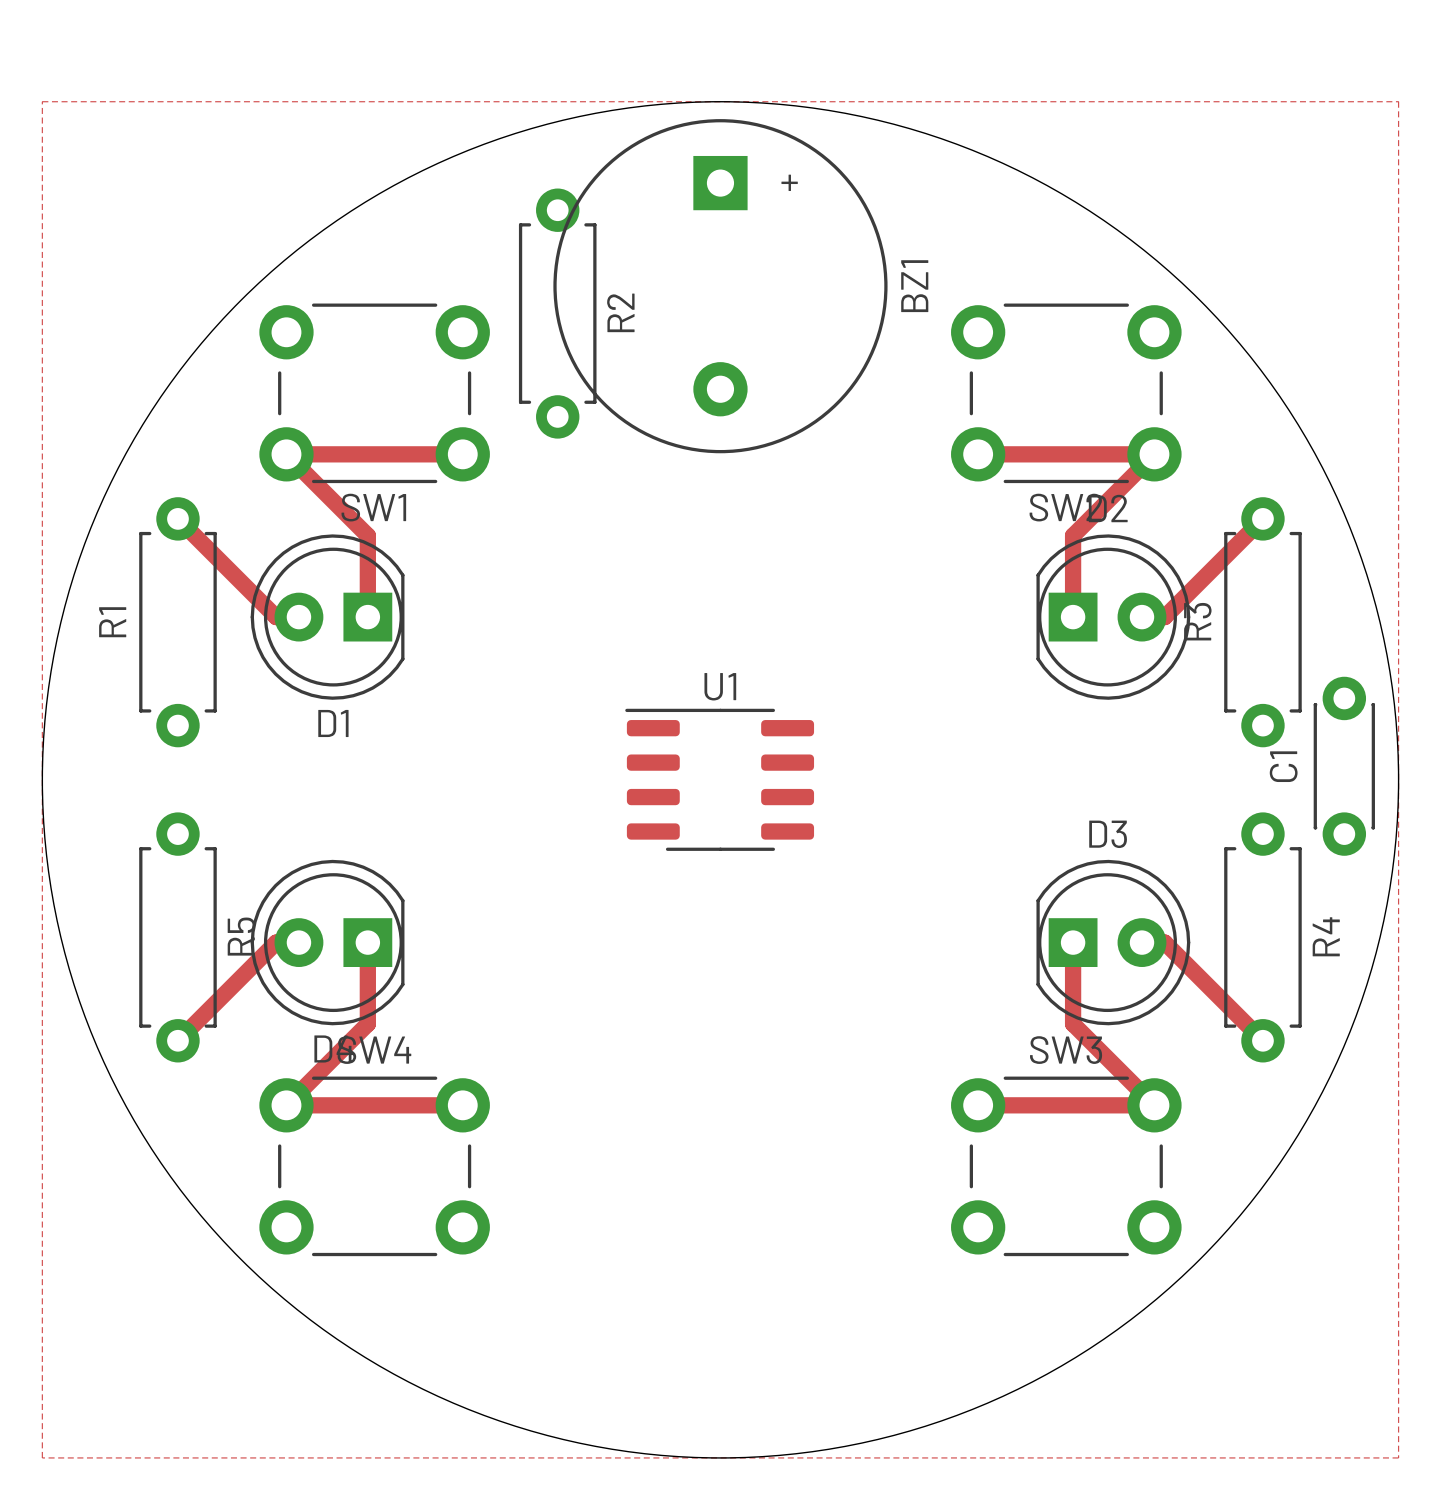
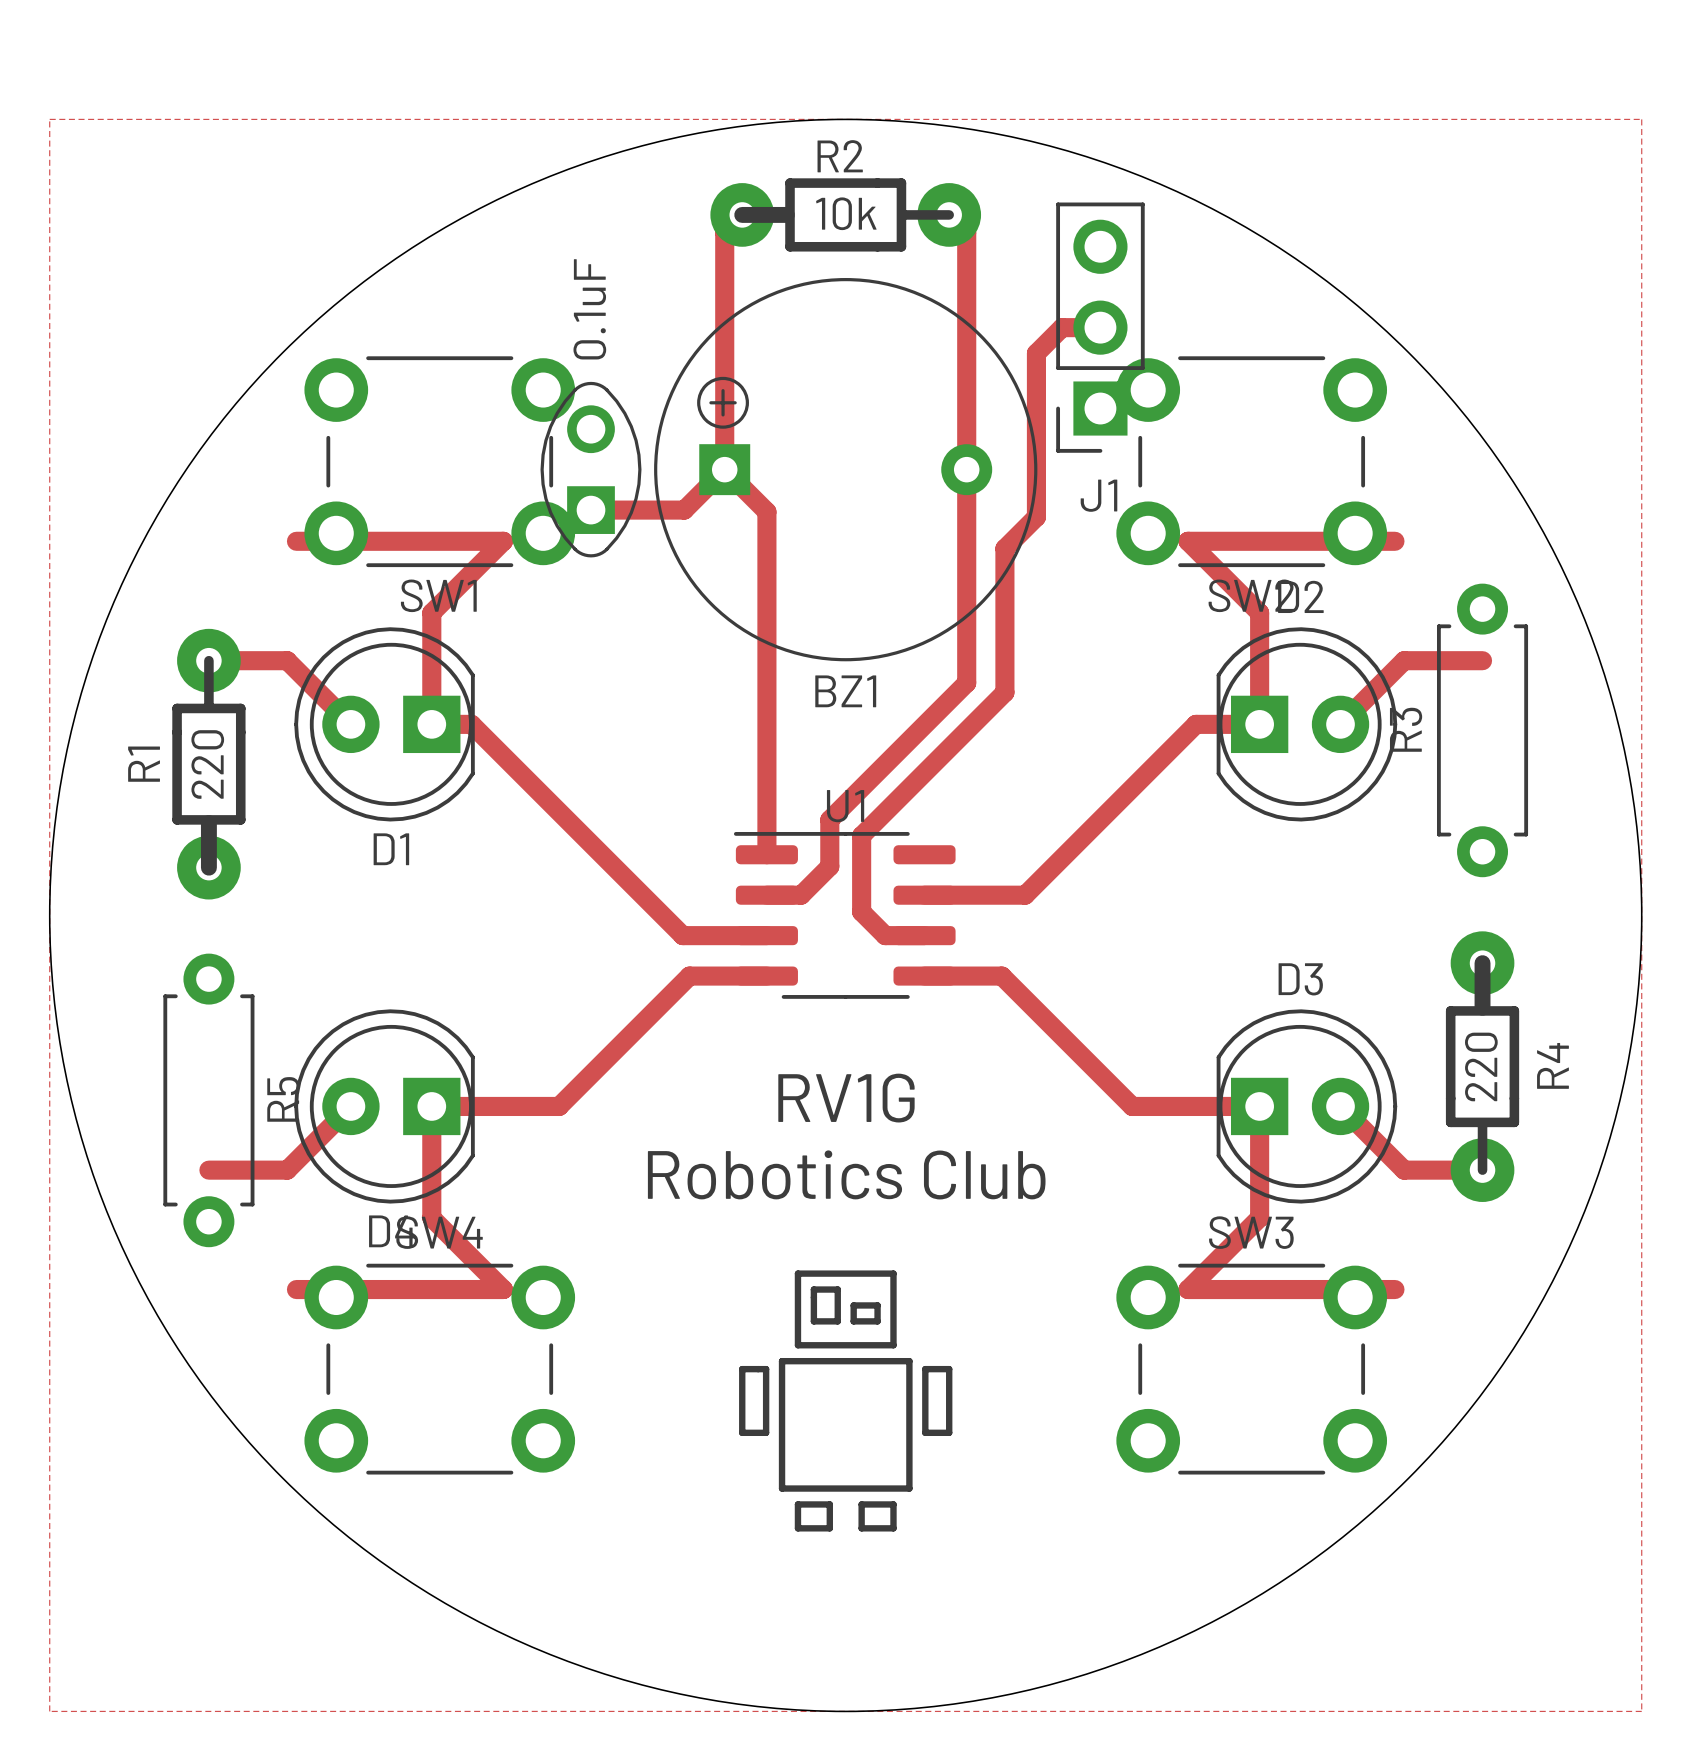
BZ1 footprint: [553, 119, 888, 454] -> [654, 278, 1038, 662]
R2 value: none -> 10k (846, 213)
track: none -> (742, 214) (724, 232) (724, 469)
track: none -> (949, 214) (966, 232) (966, 682) (829, 819) (829, 866) (801, 895) (766, 895)
R2 footprint: [518, 188, 597, 439] -> [710, 178, 982, 252]
track: none -> (1100, 327) (1062, 327) (1036, 353) (1036, 517) (1004, 548) (1004, 692) (861, 835) (861, 911) (885, 935) (924, 935)
J1: none -> (1100, 327)
BZ1 name position: BZ1 (914, 286) -> BZ1 (845, 691)
R2 name position: R2 (620, 312) -> R2 (840, 156)
part: none -> 0.1uF (591, 469)
track: none -> (724, 469) (766, 511) (766, 854)
track: none -> (724, 469) (684, 510) (591, 510)
track: (462, 454) (286, 454) (367, 535) -> (296, 541) (503, 541) (431, 612) (431, 628)
track: (978, 454) (1154, 454) (1073, 535) -> (1394, 541) (1188, 541) (1259, 612) (1259, 628)
R1 footprint: [139, 497, 217, 748] -> [172, 628, 246, 900]
track: (177, 518) (276, 617) (298, 617) -> (208, 660) (287, 660) (350, 724)
track: (1262, 518) (1164, 617) (1141, 617) -> (1482, 660) (1404, 660) (1340, 724)
track: none -> (431, 724) (471, 724) (682, 935) (766, 935)
track: none -> (1259, 724) (1195, 724) (1025, 895) (924, 895)
R1 value: none -> 220 (207, 764)
C1: (1344, 766) -> none
R4 footprint: [1224, 812, 1302, 1063] -> [1445, 931, 1520, 1202]
track: none -> (766, 976) (689, 976) (559, 1106) (431, 1106)
track: none -> (924, 976) (1001, 976) (1132, 1106) (1259, 1106)
R4 value: none -> 220 (1481, 1066)
text: none -> RV1G (846, 1098)
track: (298, 942) (276, 942) (177, 1040) -> (350, 1106) (287, 1170) (208, 1170)
track: (1141, 942) (1164, 942) (1262, 1040) -> (1340, 1106) (1404, 1170) (1482, 1170)
text: none -> Robotics Club (846, 1174)
track: (367, 1023) (286, 1105) (462, 1105) -> (431, 1201) (431, 1217) (503, 1289) (296, 1289)
track: (1073, 1023) (1154, 1105) (978, 1105) -> (1259, 1201) (1259, 1217) (1188, 1289) (1394, 1289)
line: none -> (797, 1273) (797, 1345) (893, 1345) (893, 1273) (797, 1273)
line: none -> (813, 1289) (813, 1321) (837, 1321) (837, 1289) (813, 1289)
line: none -> (853, 1305) (877, 1305) (877, 1321) (853, 1321) (853, 1305)
line: none -> (782, 1361) (909, 1361) (909, 1488) (782, 1488) (782, 1361)
line: none -> (742, 1369) (766, 1369) (766, 1432) (742, 1432) (742, 1369)
line: none -> (925, 1369) (949, 1369) (949, 1432) (925, 1432) (925, 1369)
line: none -> (797, 1504) (829, 1504) (829, 1528) (797, 1528) (797, 1504)
line: none -> (861, 1504) (893, 1504) (893, 1528) (861, 1528) (861, 1504)

